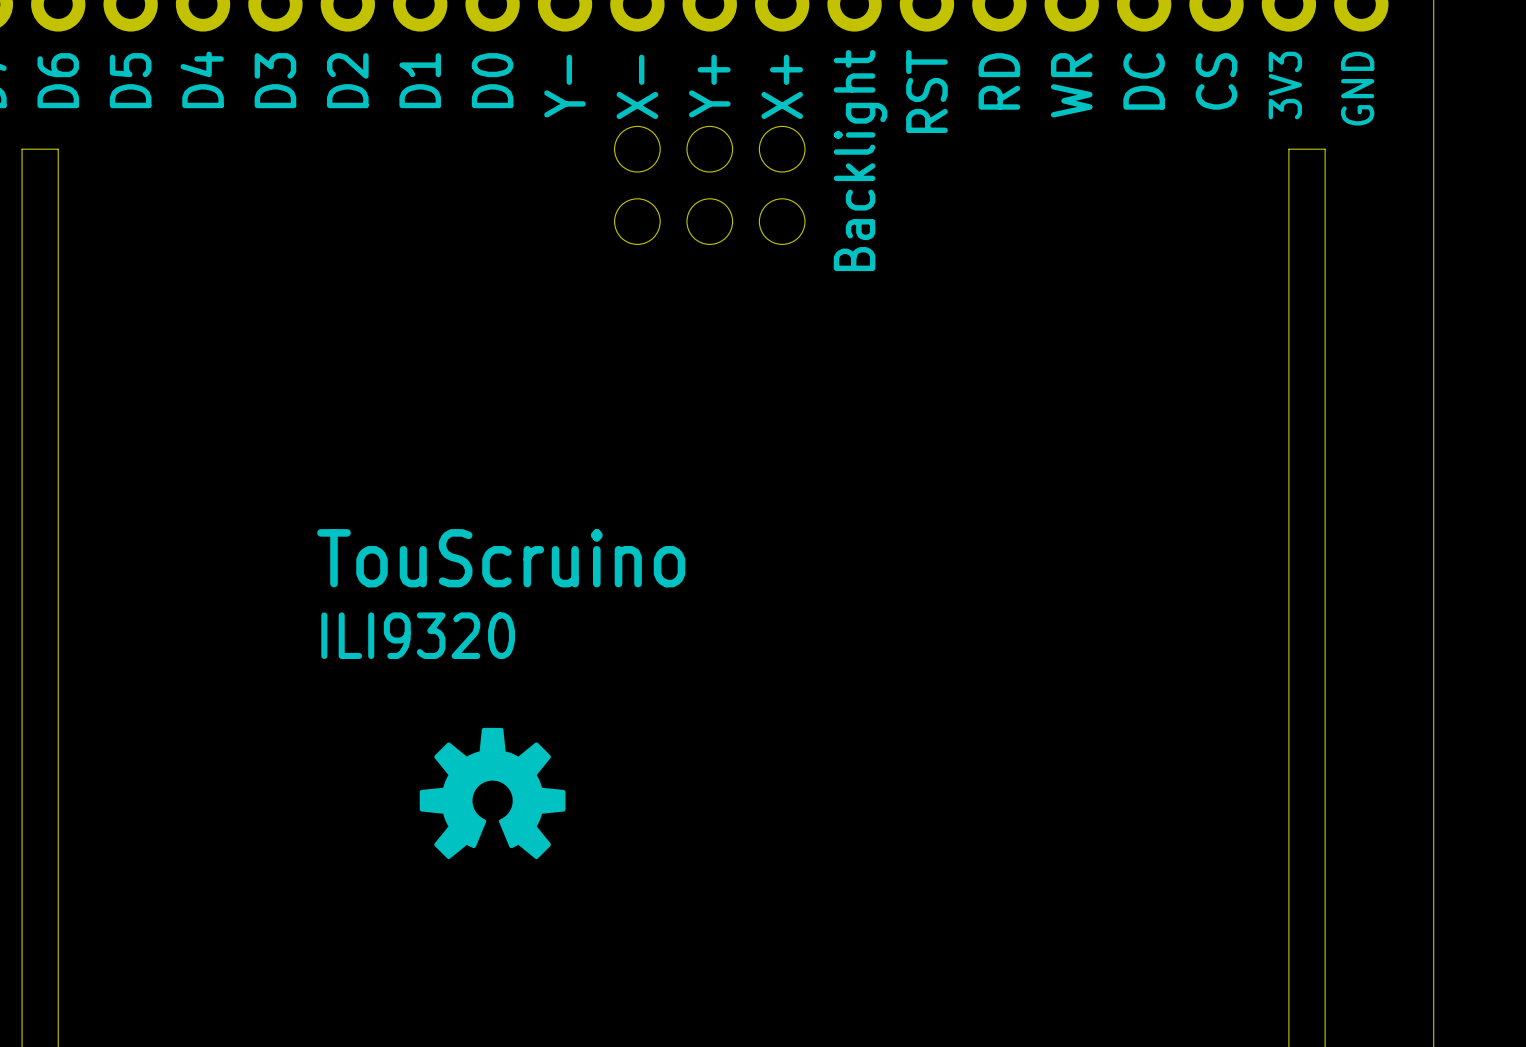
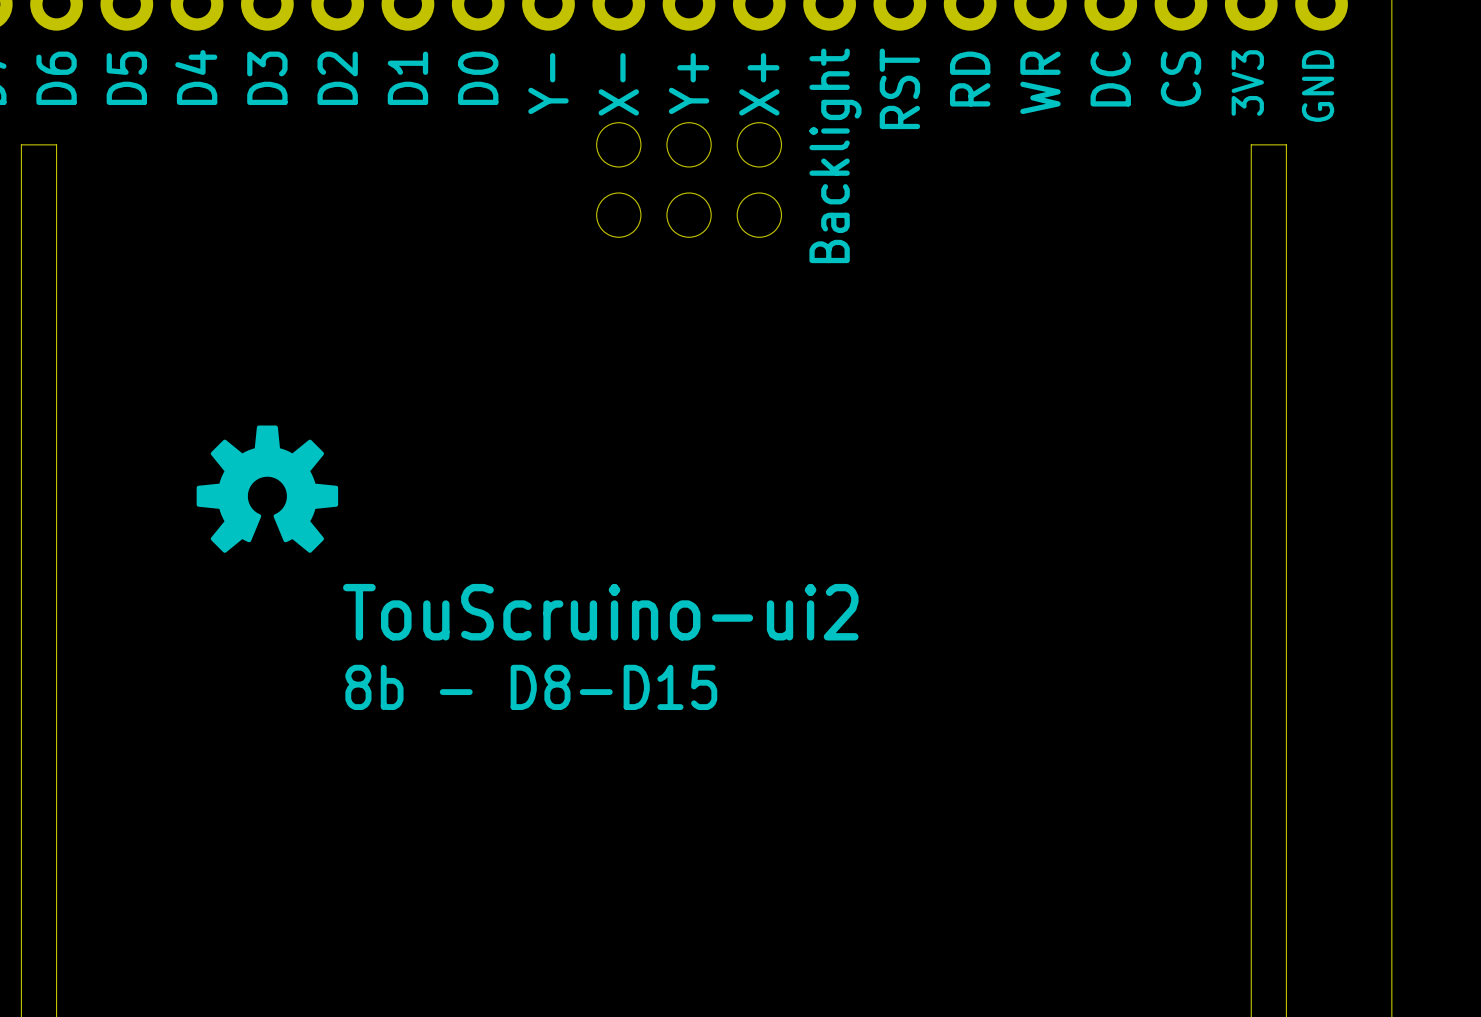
text: TouScruino (501, 558) -> TouScruino-ui2 (600, 612)
text: ILI9320 (418, 635) -> none
text: none -> 8b - D8-D15 (531, 687)
drawing position: (492, 793) -> (267, 489)

